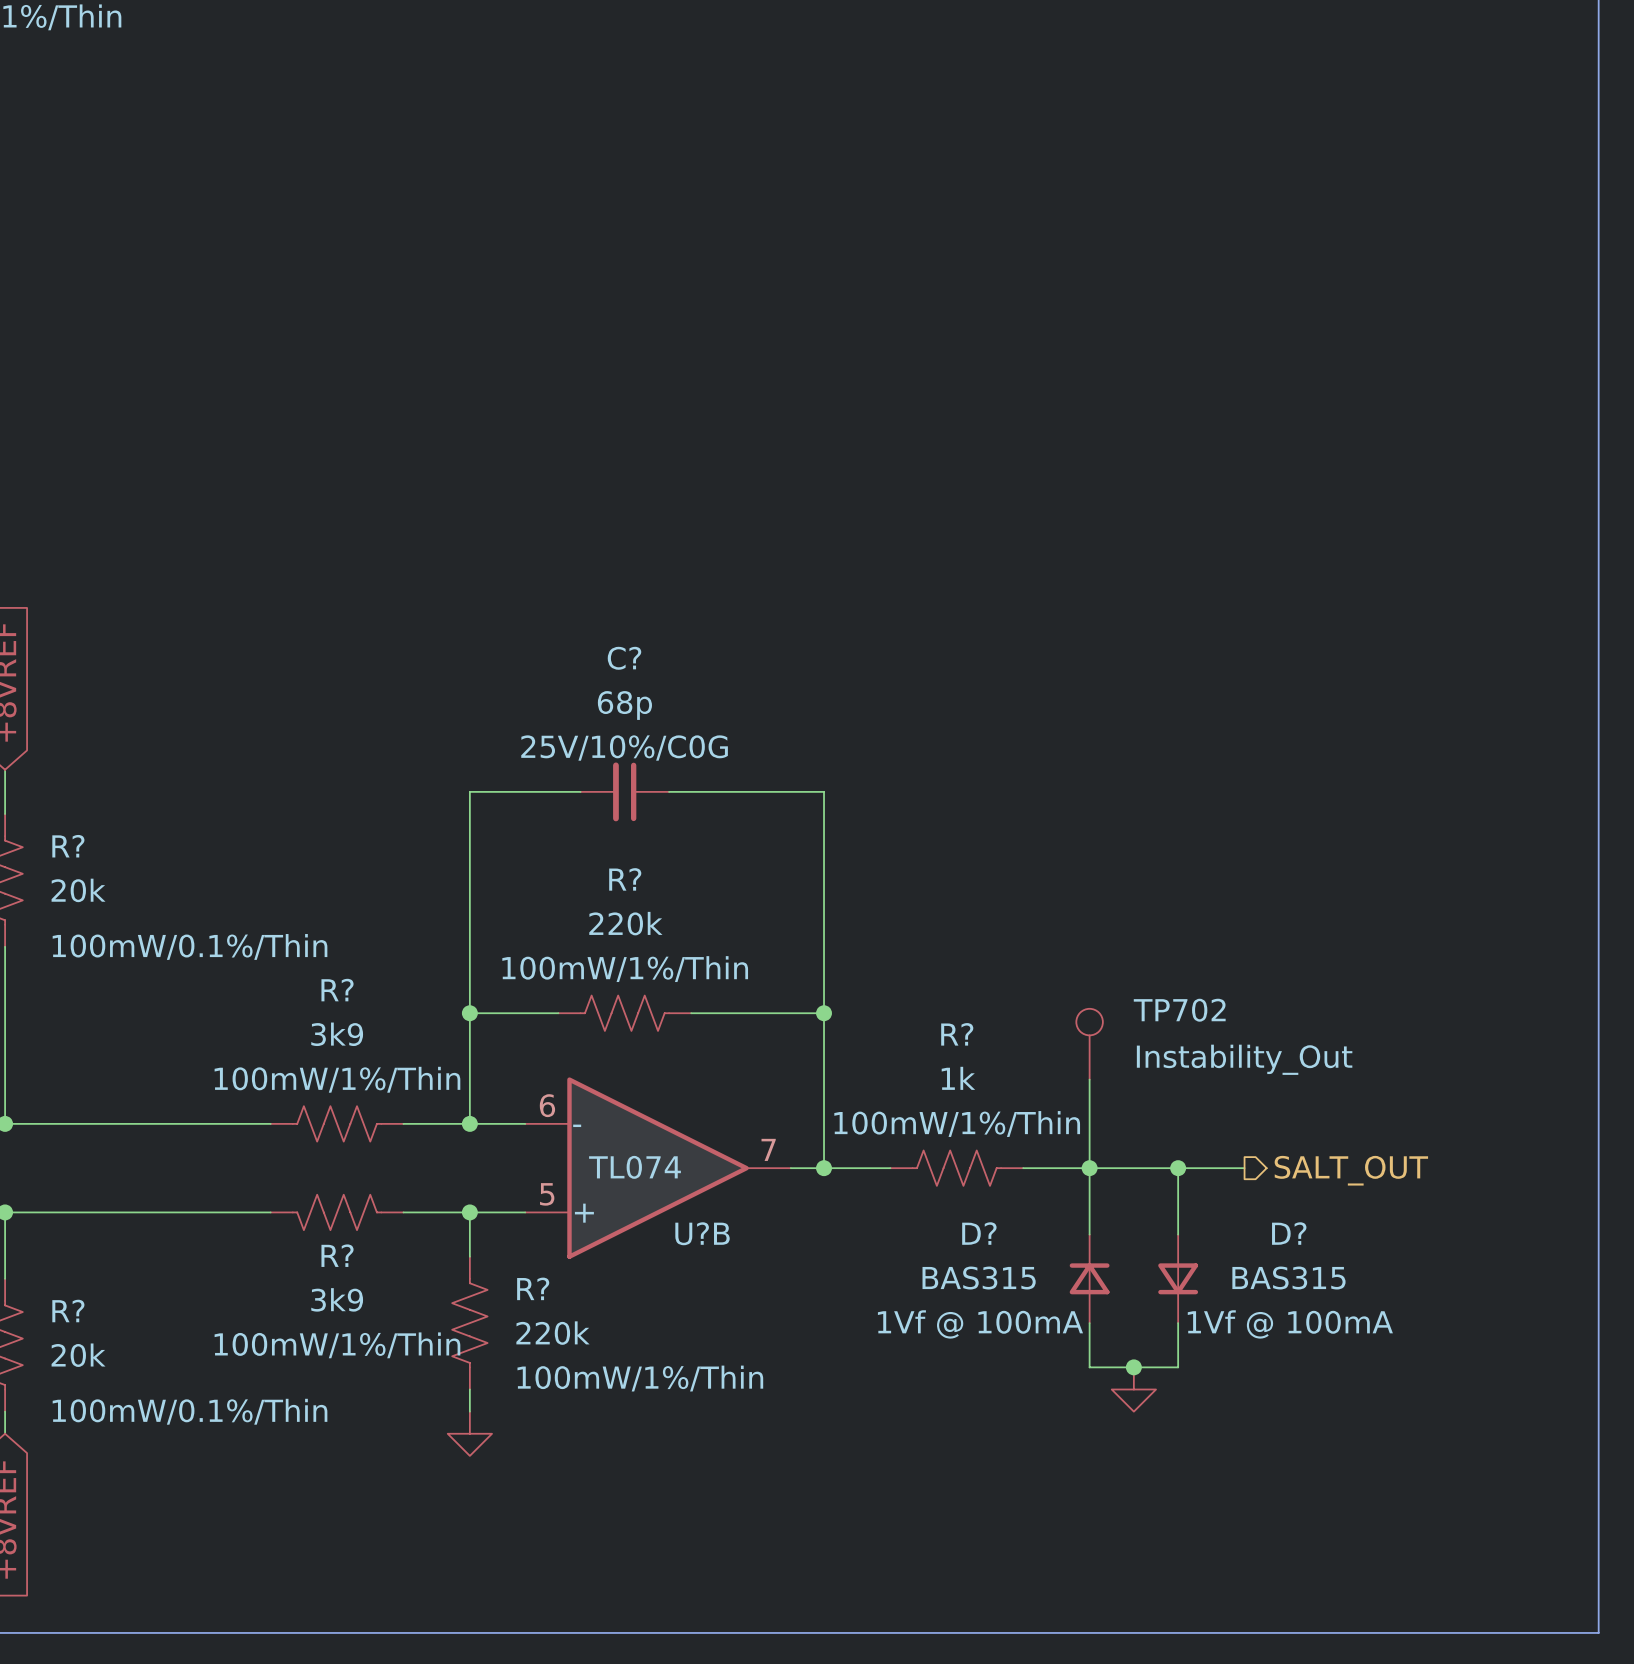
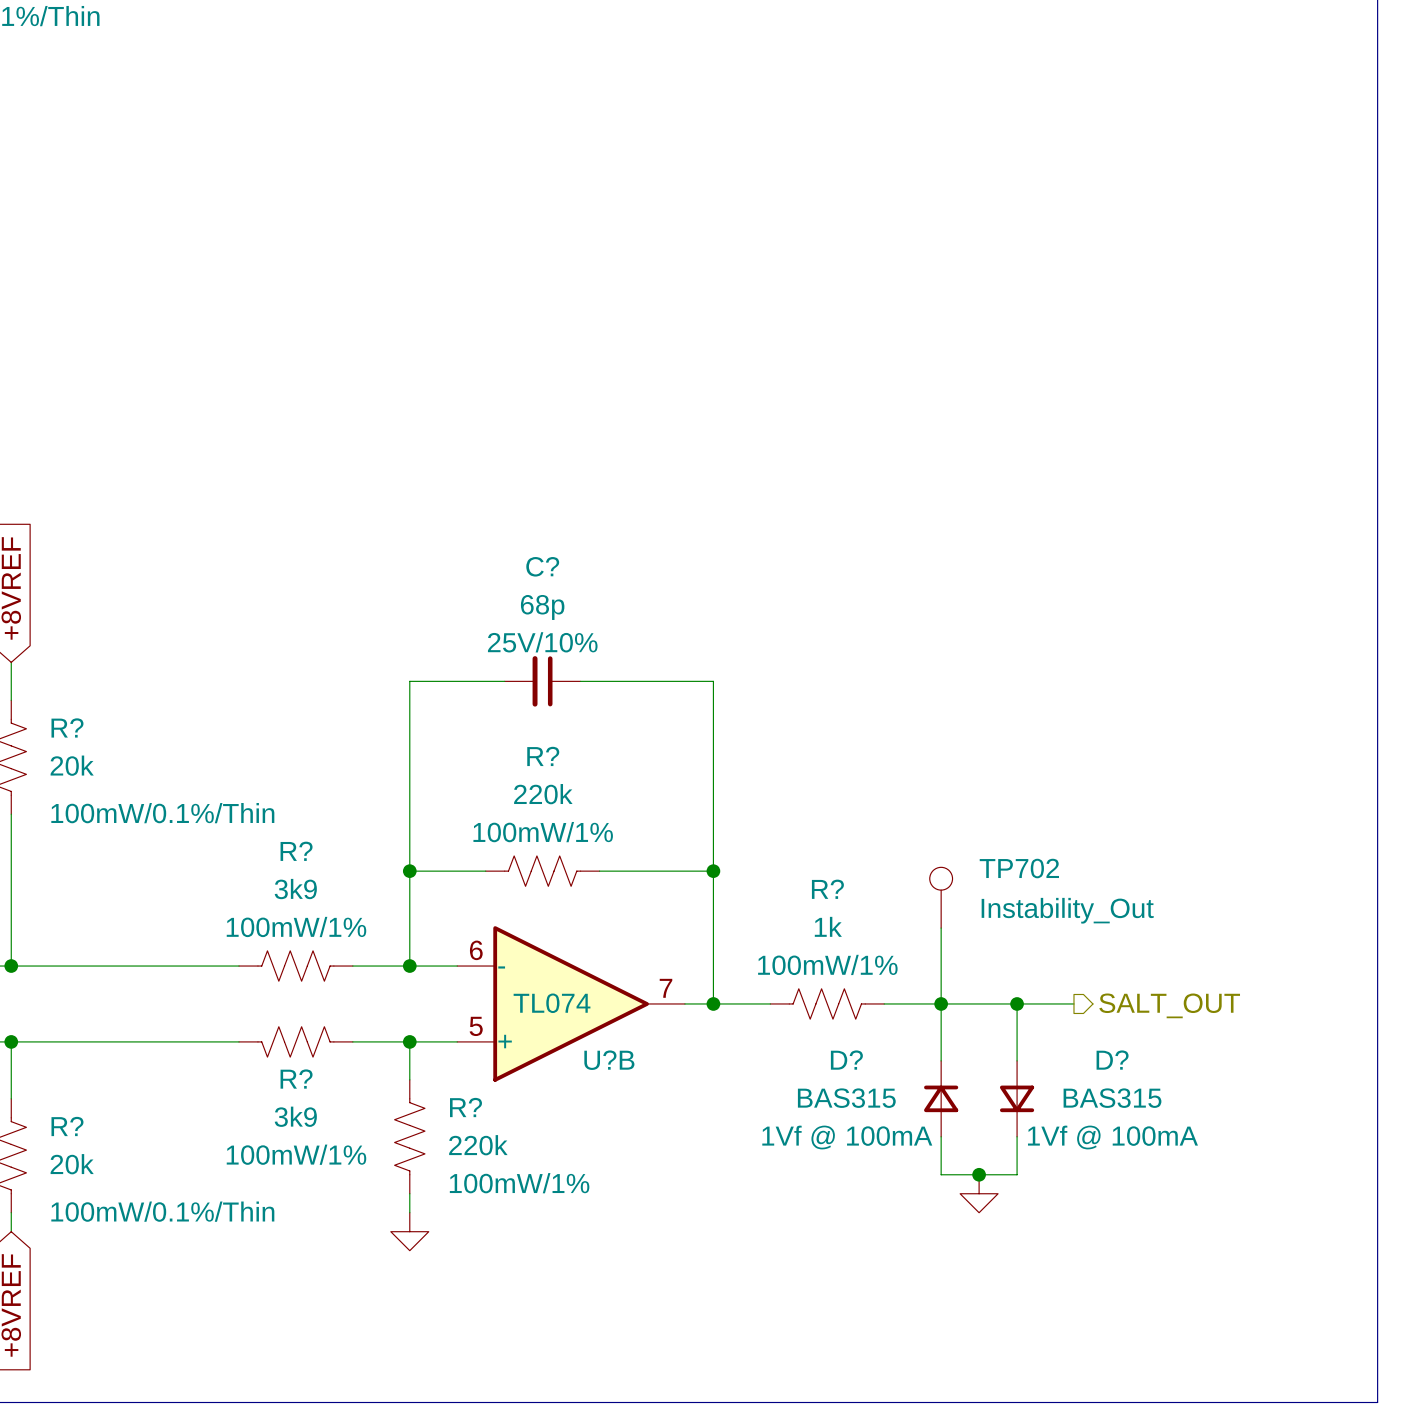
C? text: 25V/10%/C0G (624, 748) -> 25V/10% (542, 642)
R? text: 100mW/1%/Thin (625, 969) -> 100mW/1% (543, 832)
R? text: 100mW/1%/Thin (337, 1079) -> 100mW/1% (296, 926)
R? text: 100mW/1%/Thin (957, 1124) -> 100mW/1% (827, 964)
R? text: 100mW/1%/Thin (337, 1345) -> 100mW/1% (296, 1154)
R? text: 100mW/1%/Thin (640, 1378) -> 100mW/1% (519, 1183)

